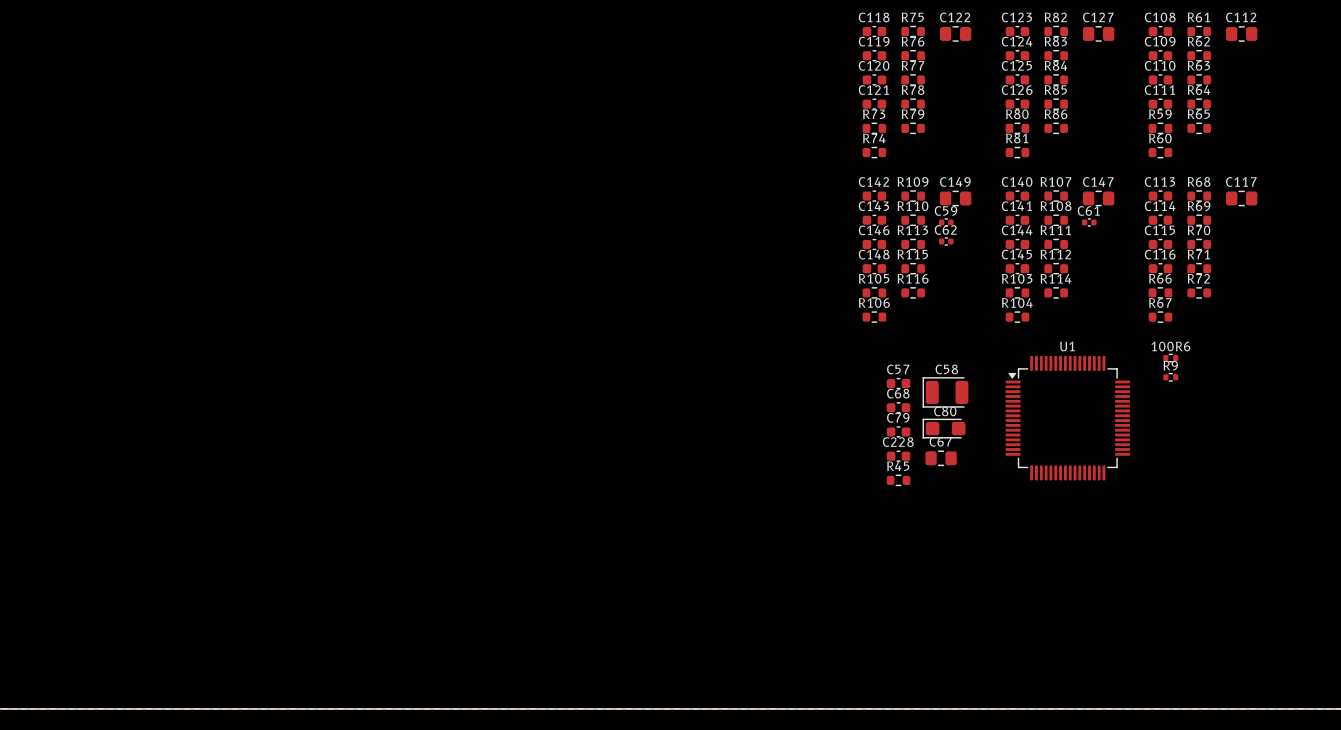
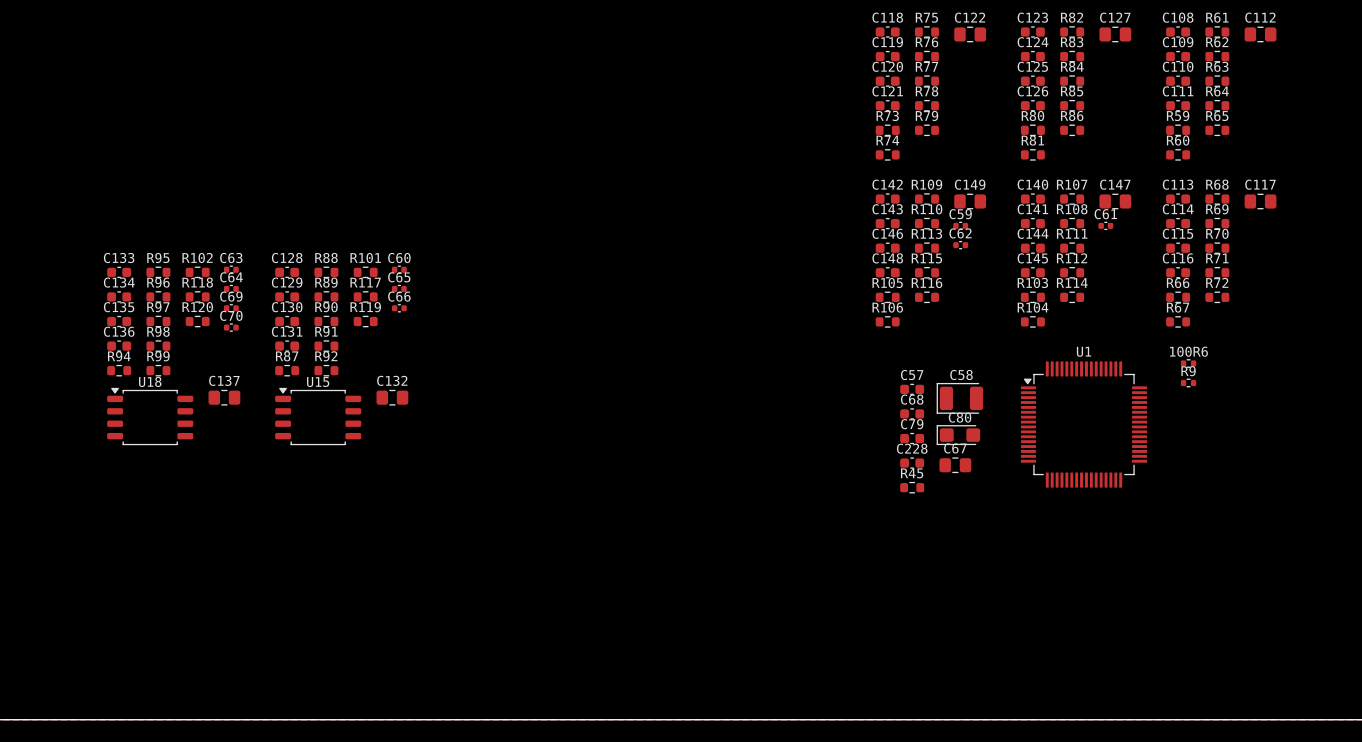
C63: none -> (231, 269)
C60: none -> (399, 269)
C133: none -> (119, 272)
R95: none -> (158, 272)
R102: none -> (197, 272)
C128: none -> (287, 272)
R88: none -> (326, 272)
R101: none -> (365, 272)
C64: none -> (231, 289)
C65: none -> (399, 289)
C134: none -> (119, 296)
R96: none -> (158, 296)
R118: none -> (197, 296)
C129: none -> (287, 296)
R89: none -> (326, 296)
R117: none -> (365, 296)
C69: none -> (231, 308)
C66: none -> (399, 308)
C135: none -> (119, 321)
R97: none -> (158, 321)
R120: none -> (197, 321)
C130: none -> (287, 321)
R90: none -> (326, 321)
R119: none -> (365, 321)
C70: none -> (231, 327)
C136: none -> (119, 346)
R98: none -> (158, 346)
C131: none -> (287, 346)
R91: none -> (326, 346)
R94: none -> (119, 370)
R99: none -> (158, 370)
R87: none -> (287, 370)
R92: none -> (326, 370)
C137: none -> (224, 397)
C132: none -> (392, 397)
U18: none -> (150, 416)
U15: none -> (318, 416)

